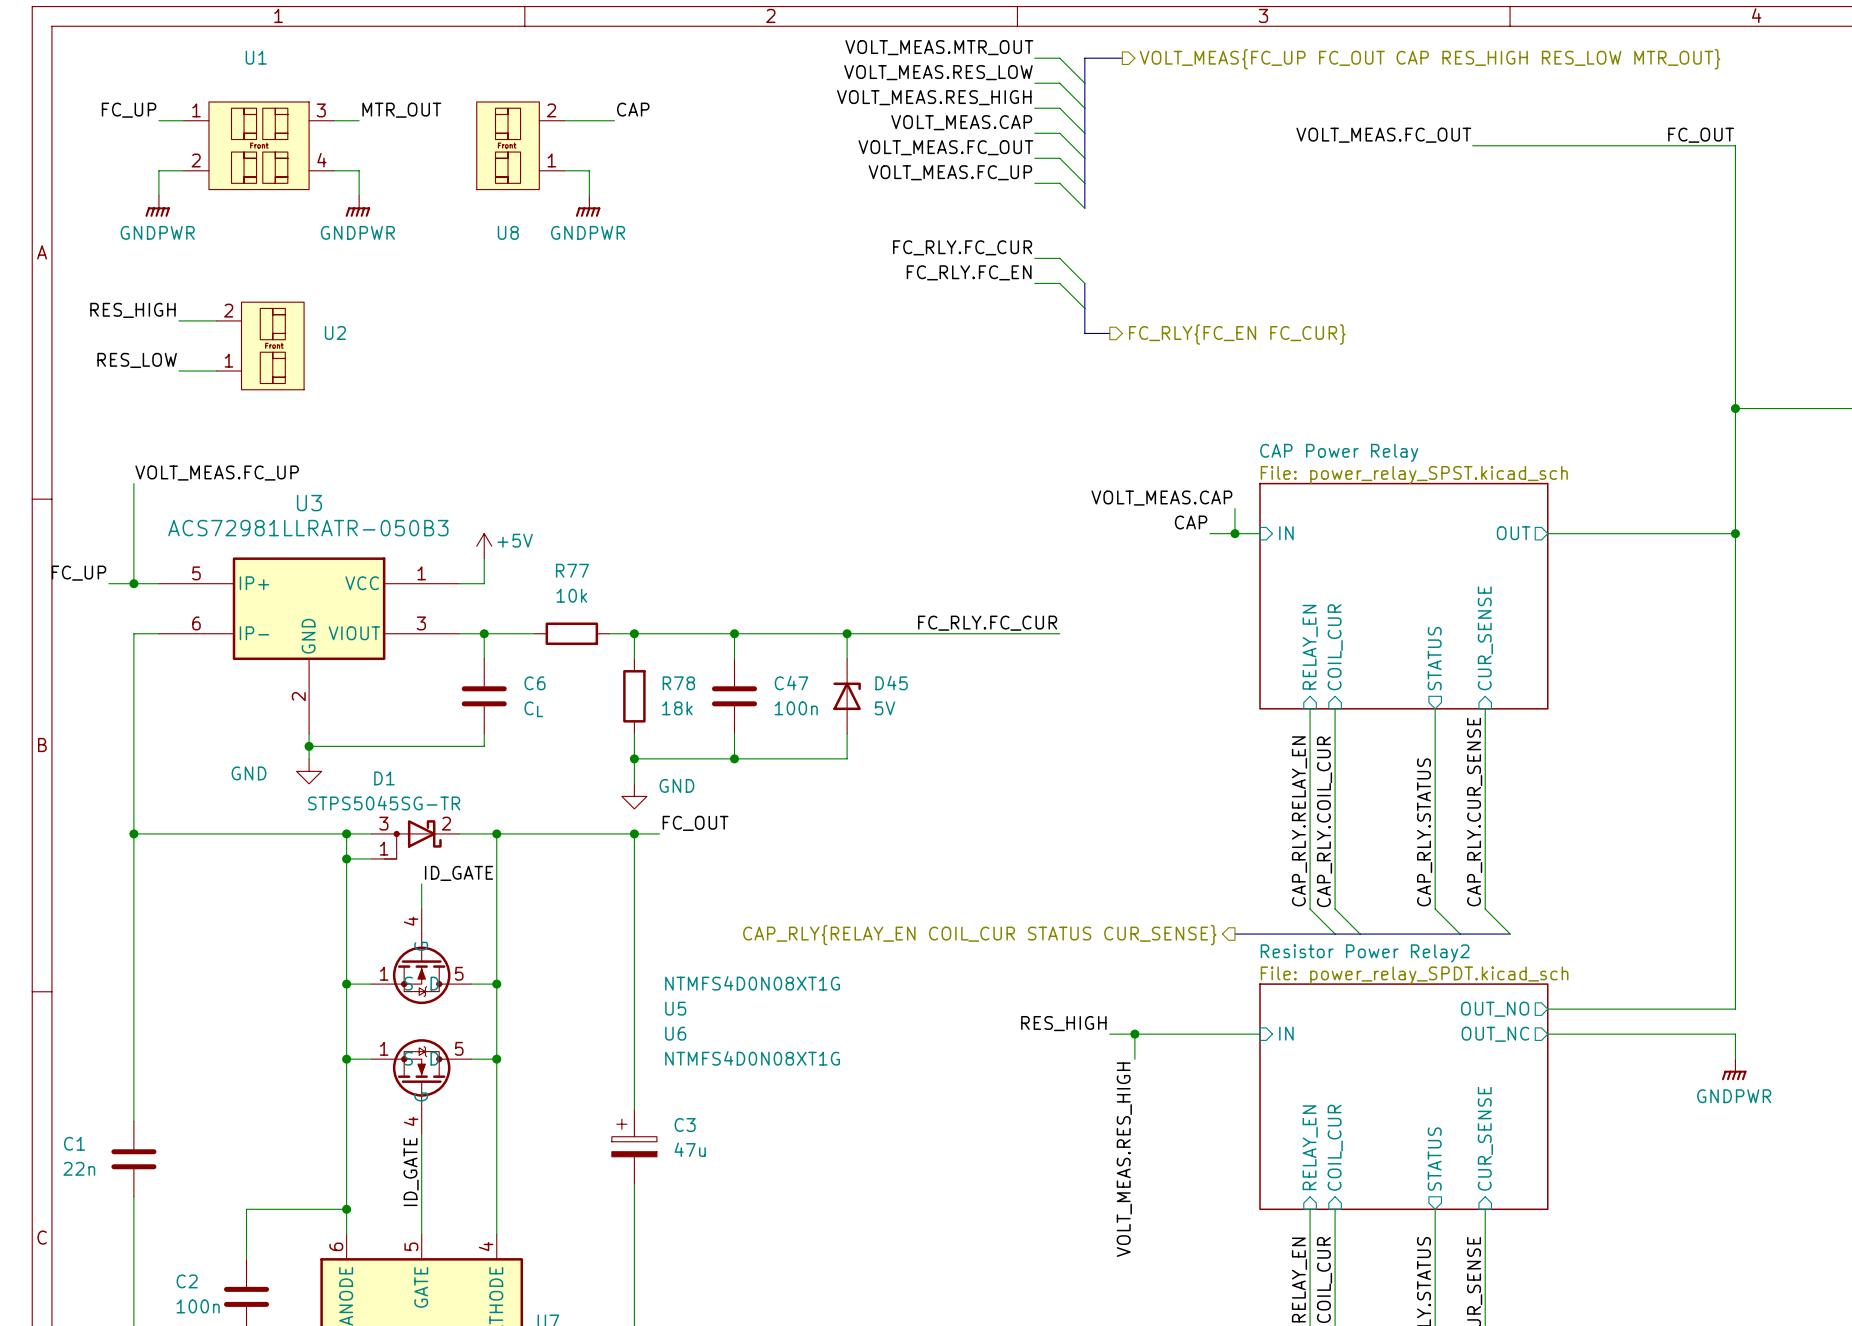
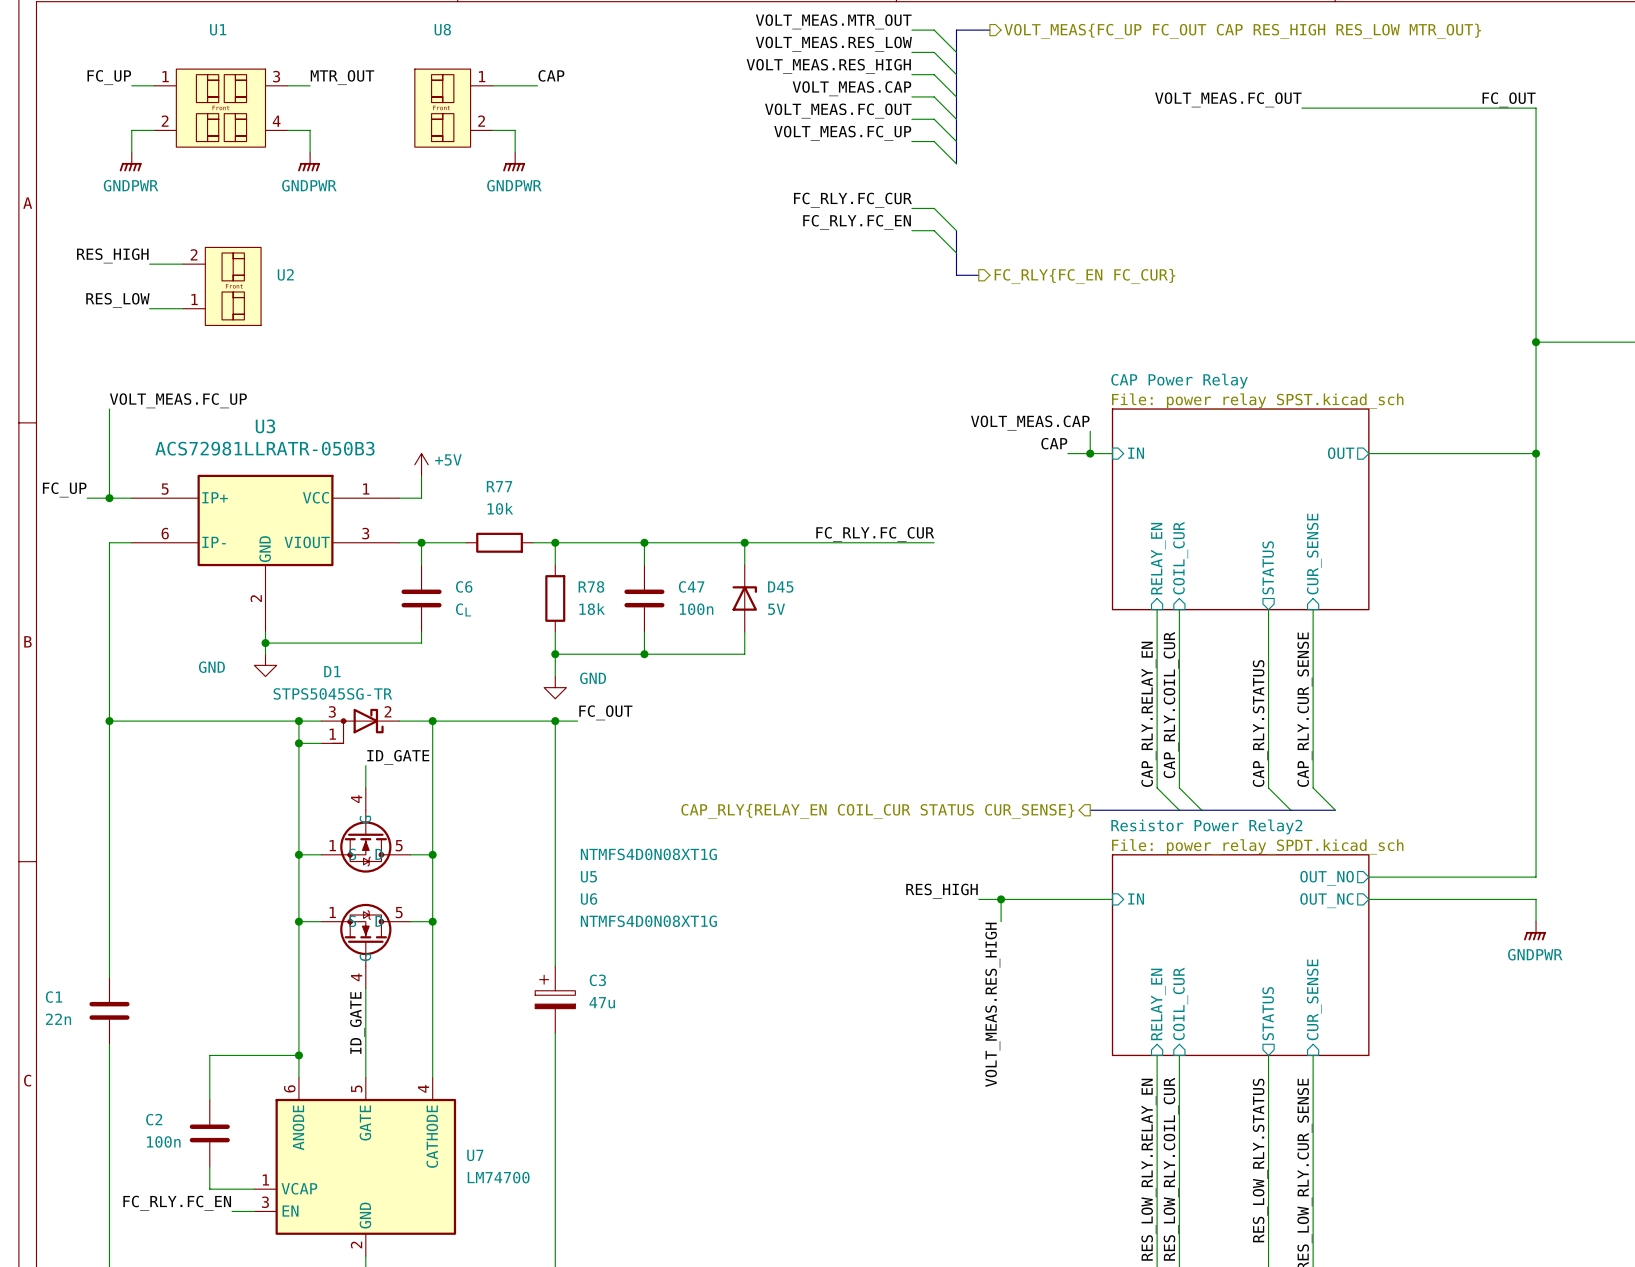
U8 flip: as is (508, 145) -> up-down (442, 108)

